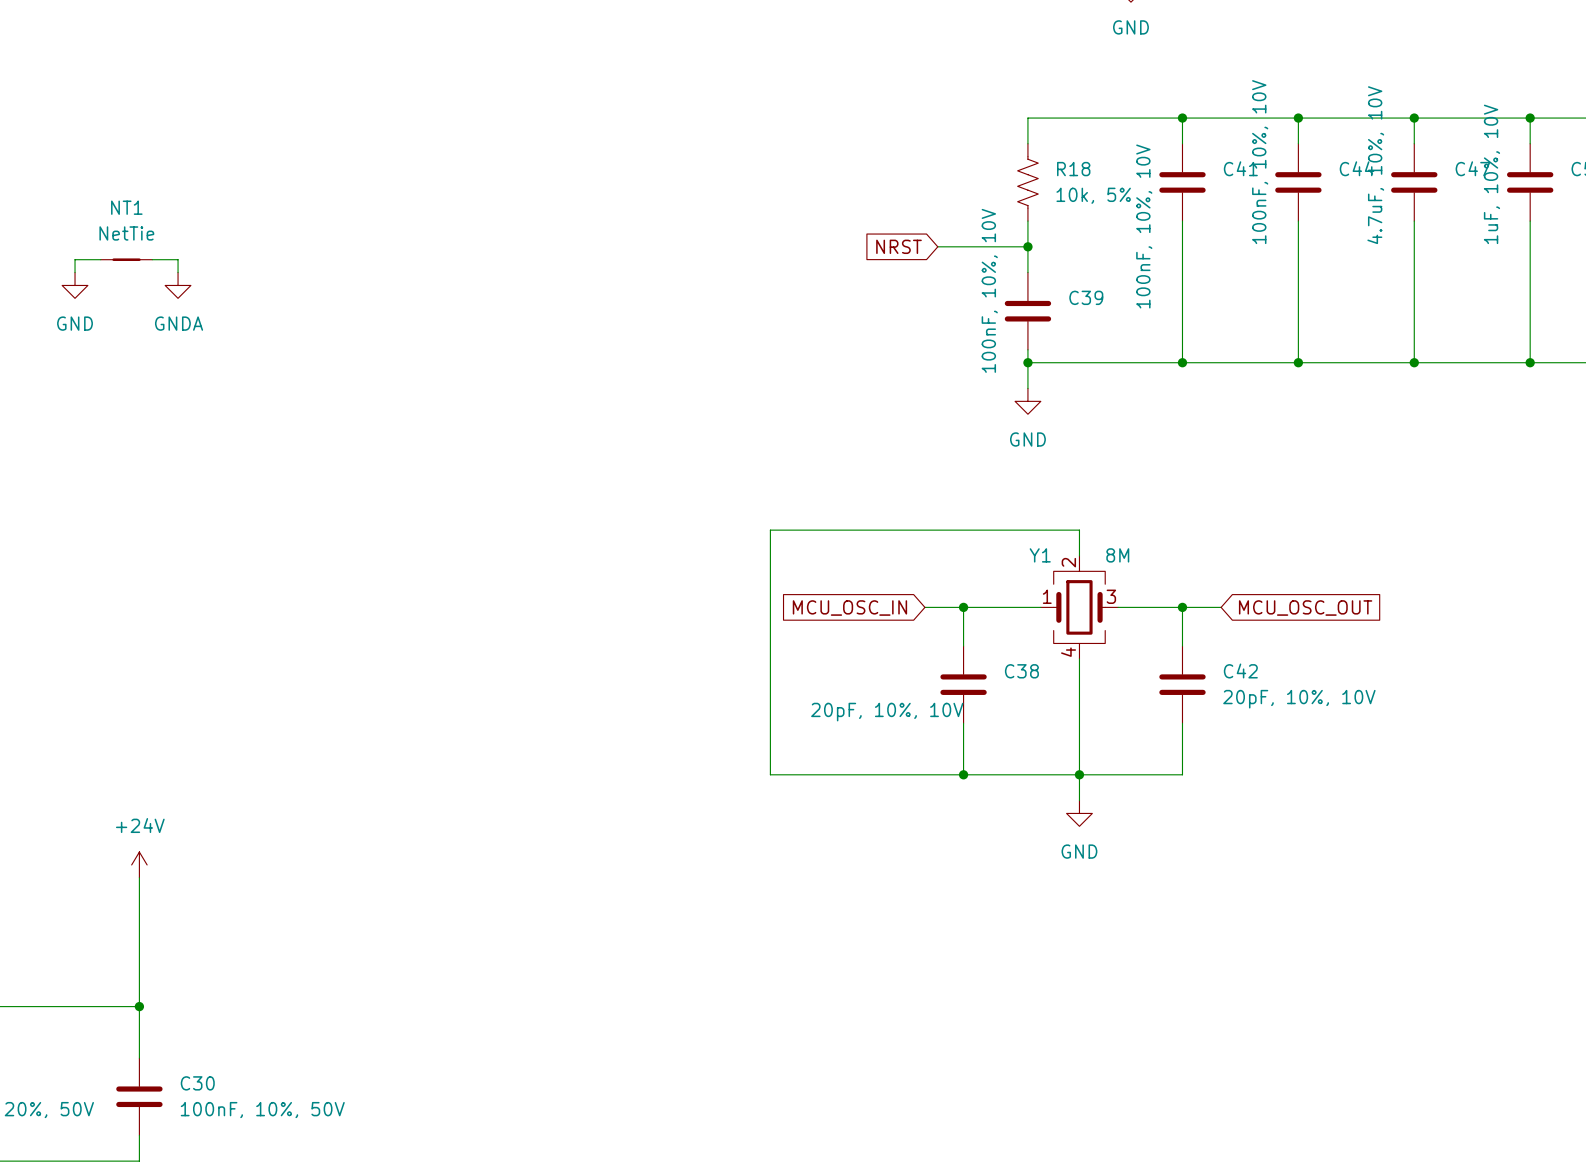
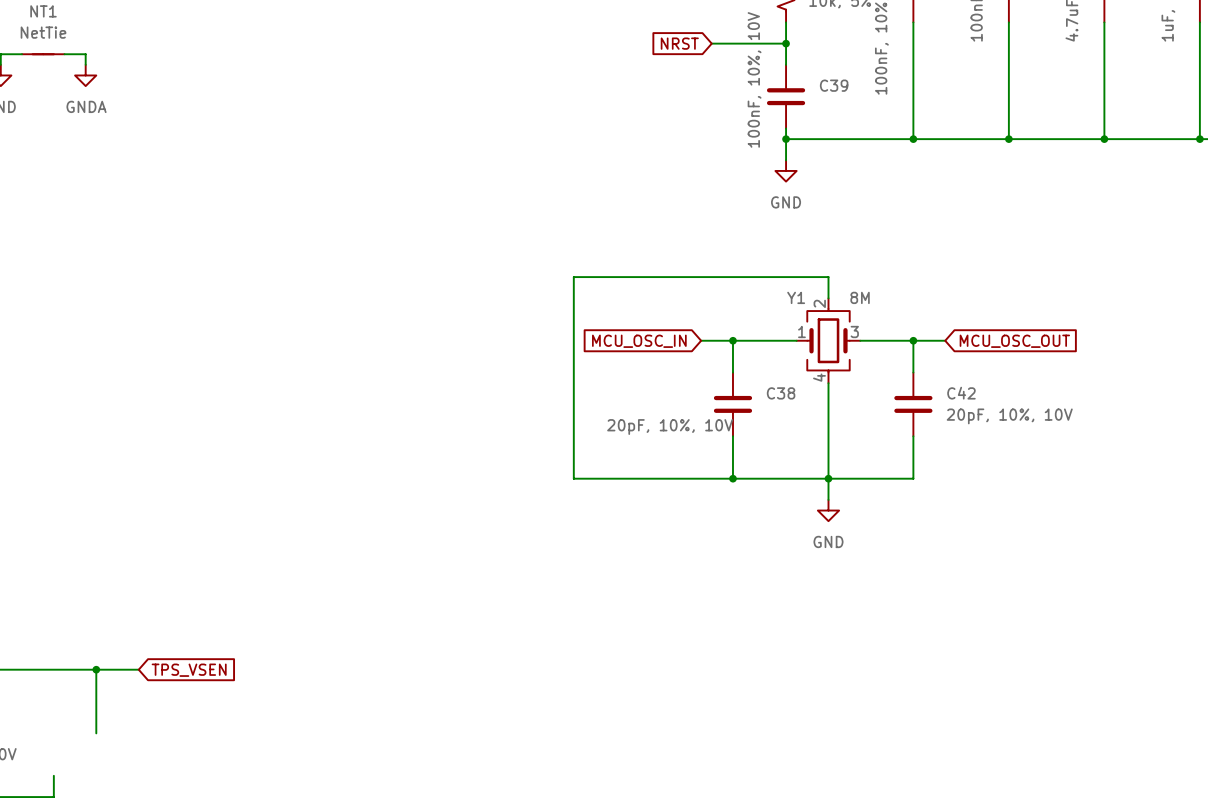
power symbol: +24V (139, 864) -> none
wire: (139, 877) (139, 1058) -> none
wire: none -> (53, 669) (138, 669)
junction position: (139, 1006) -> (96, 669)
wire: none -> (96, 669) (96, 733)
global label: none -> TPS_VSEN (189, 670)
C30: 100nF, 10%, 50V (139, 1096) -> none

